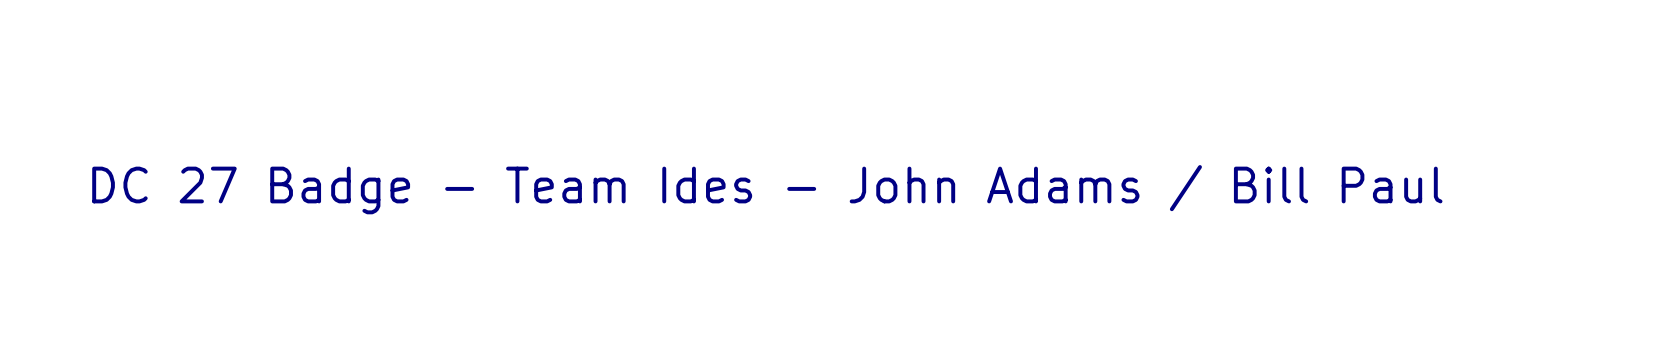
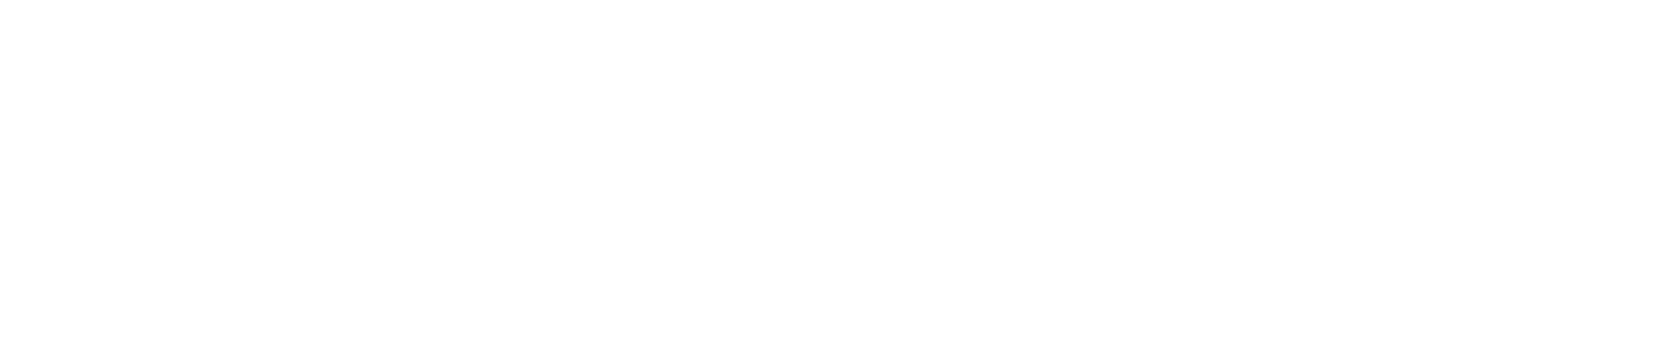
text: DC 27 Badge - Team Ides - John Adams / Bill Paul (767, 189) -> none

